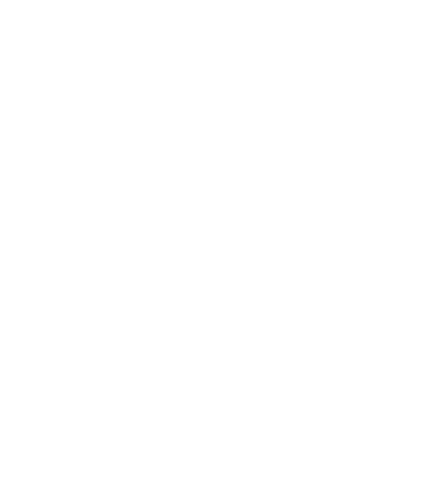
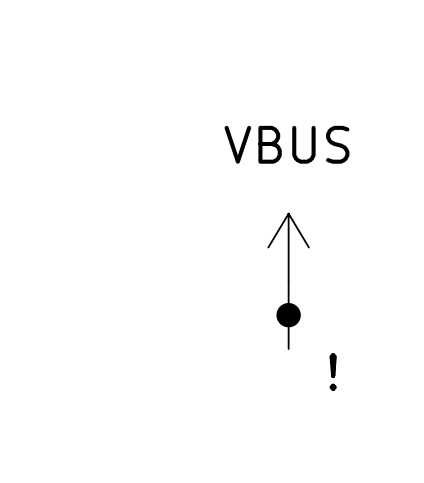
power symbol: none -> VBUS (288, 247)
wire: none -> (288, 281) (288, 348)
junction: none -> (288, 315)
text: none -> ! (333, 372)

